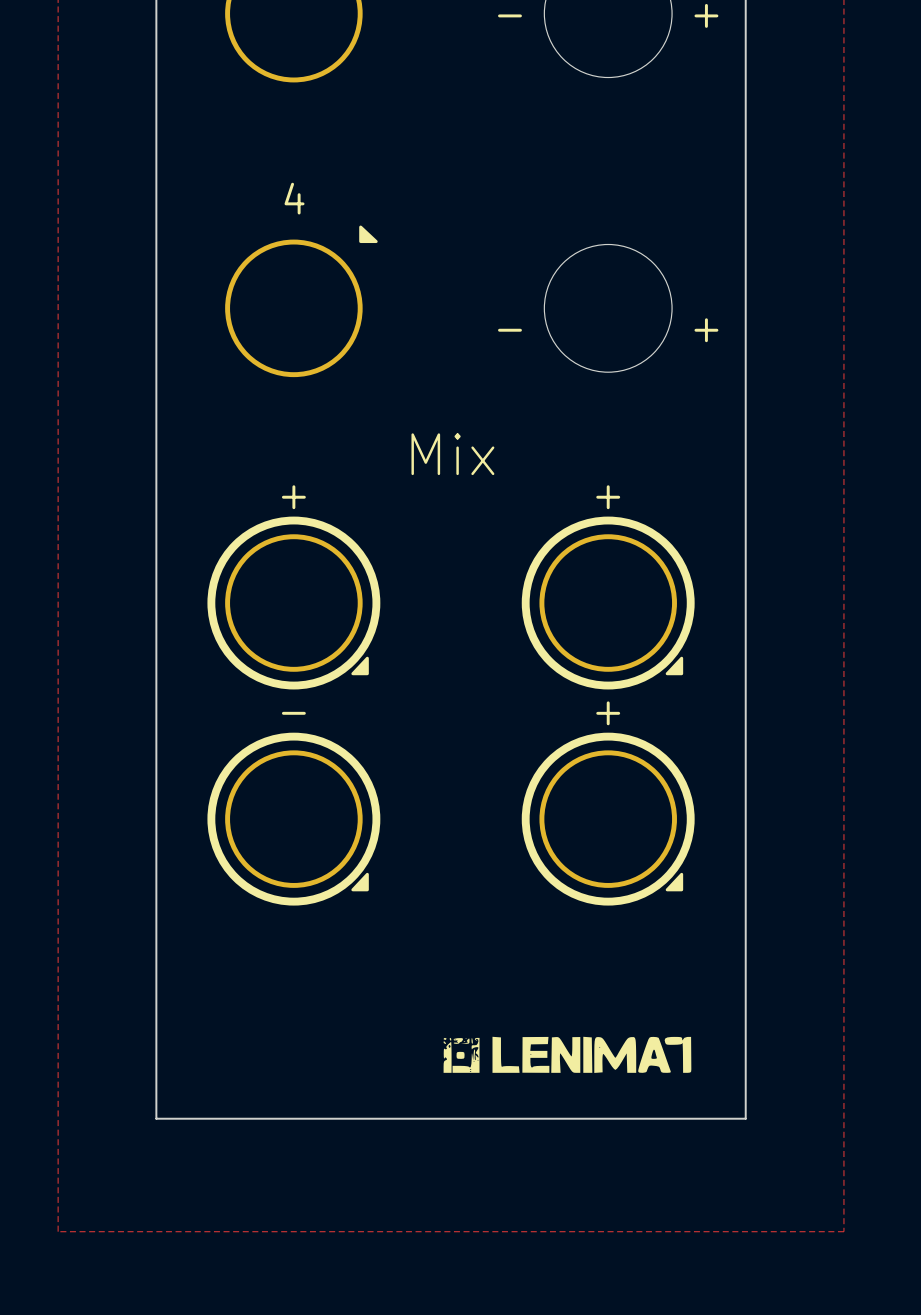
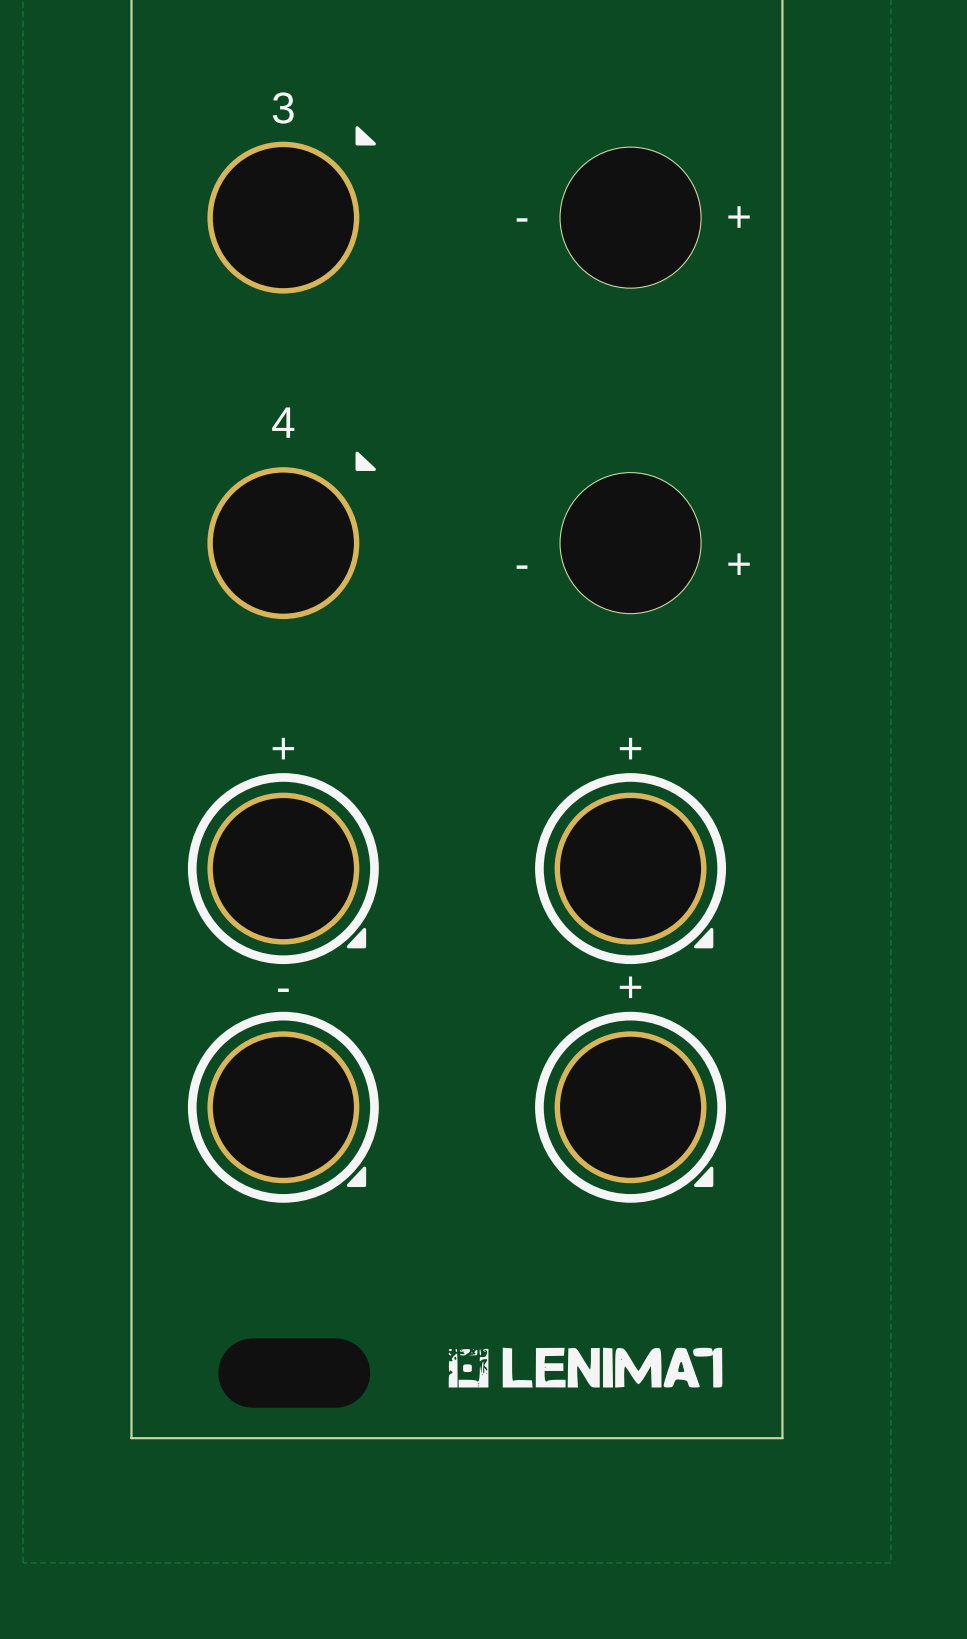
text: Mix (452, 454) -> none

